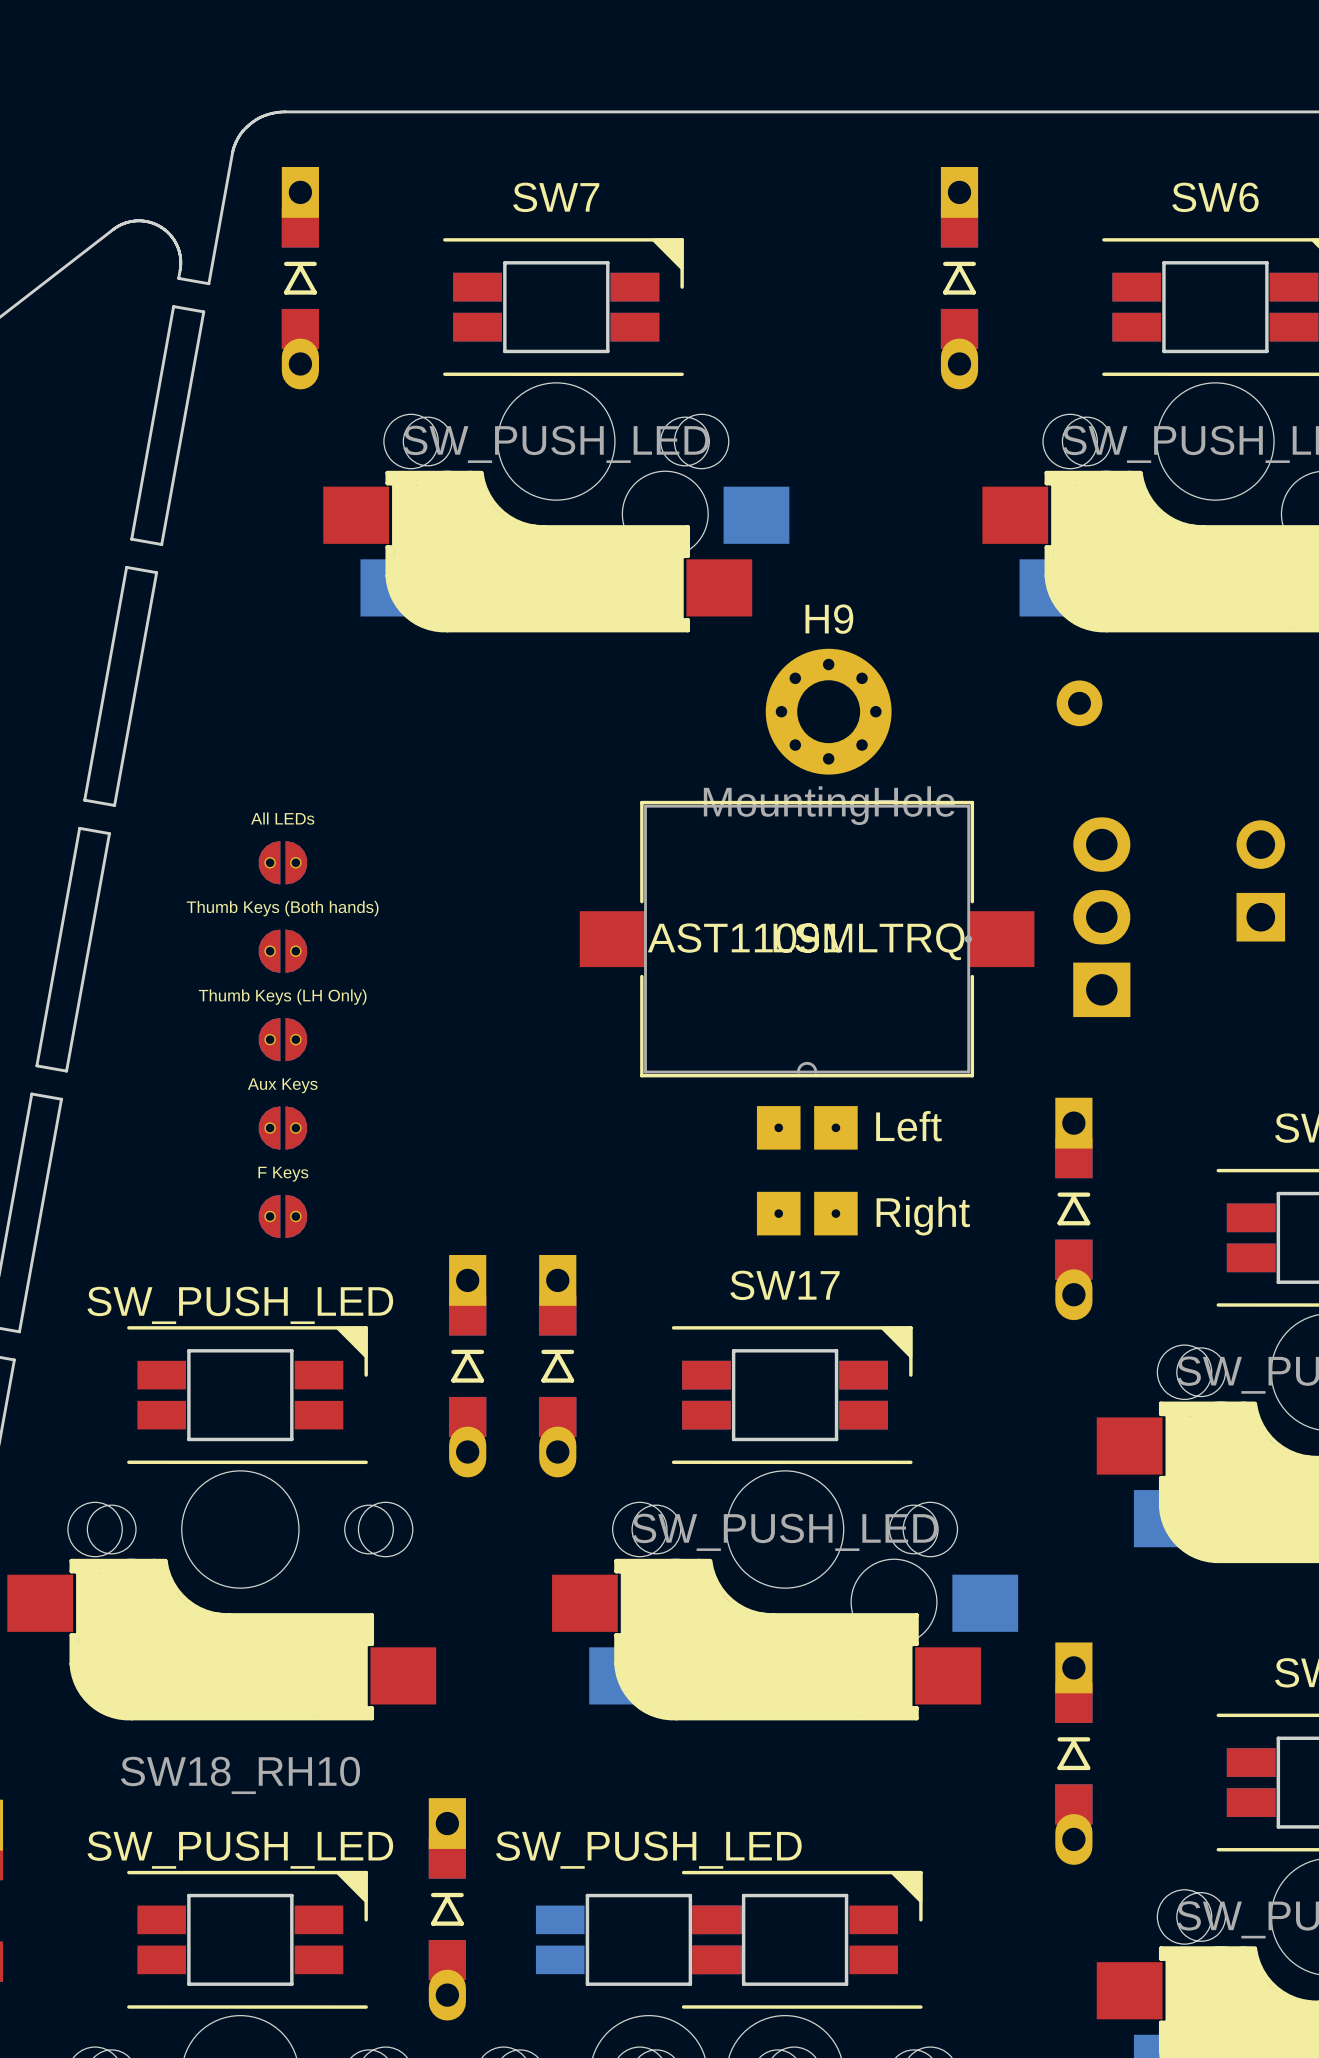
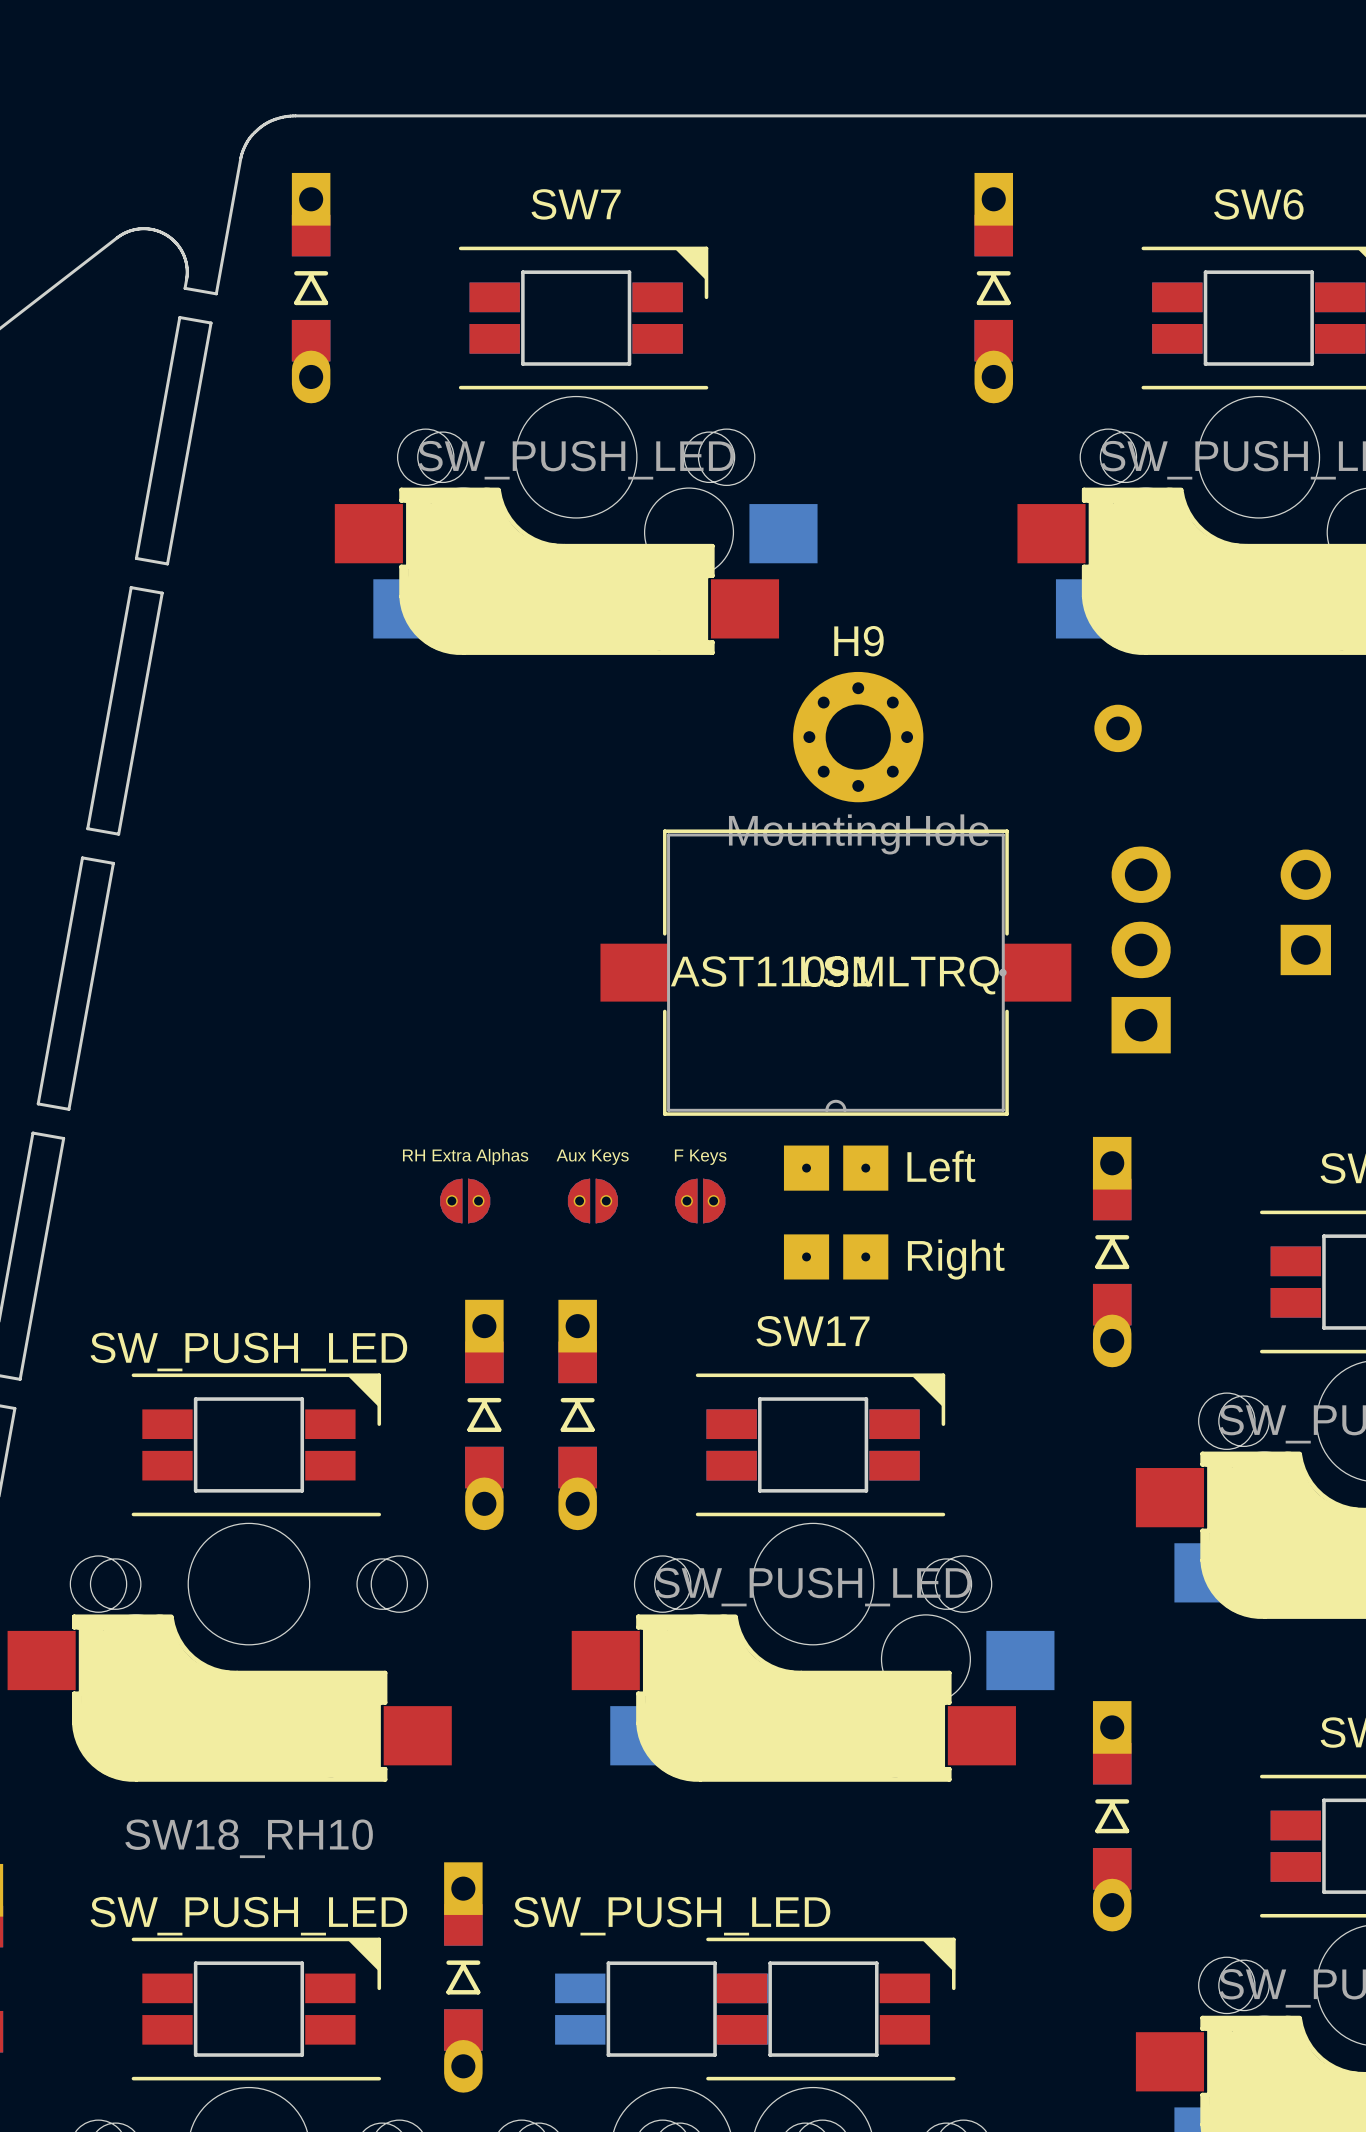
part: All LEDs (282, 862) -> none
part: Thumb Keys (Both hands) (282, 951) -> none
part: Thumb Keys (LH Only) (282, 1039) -> none
part position: (282, 1128) -> (592, 1201)
part: none -> RH Extra Alphas (465, 1201)
part position: (282, 1216) -> (700, 1201)

